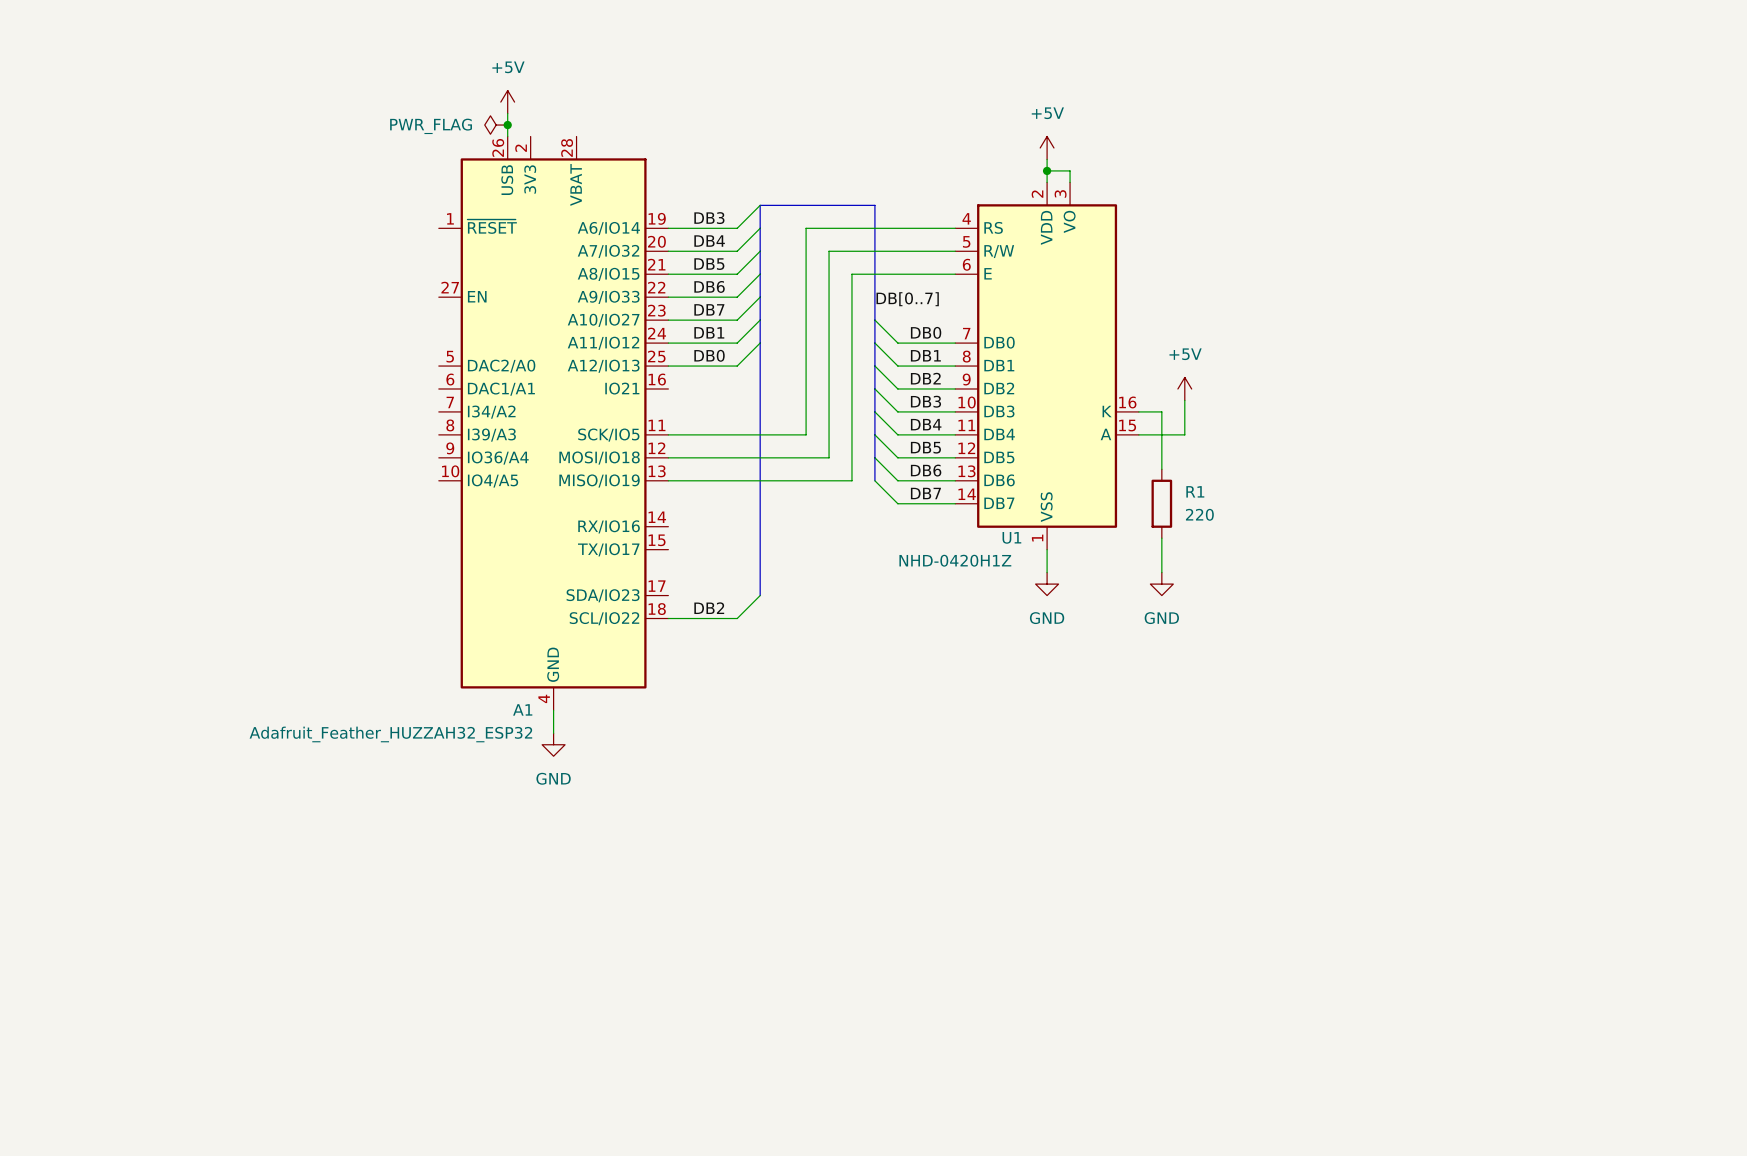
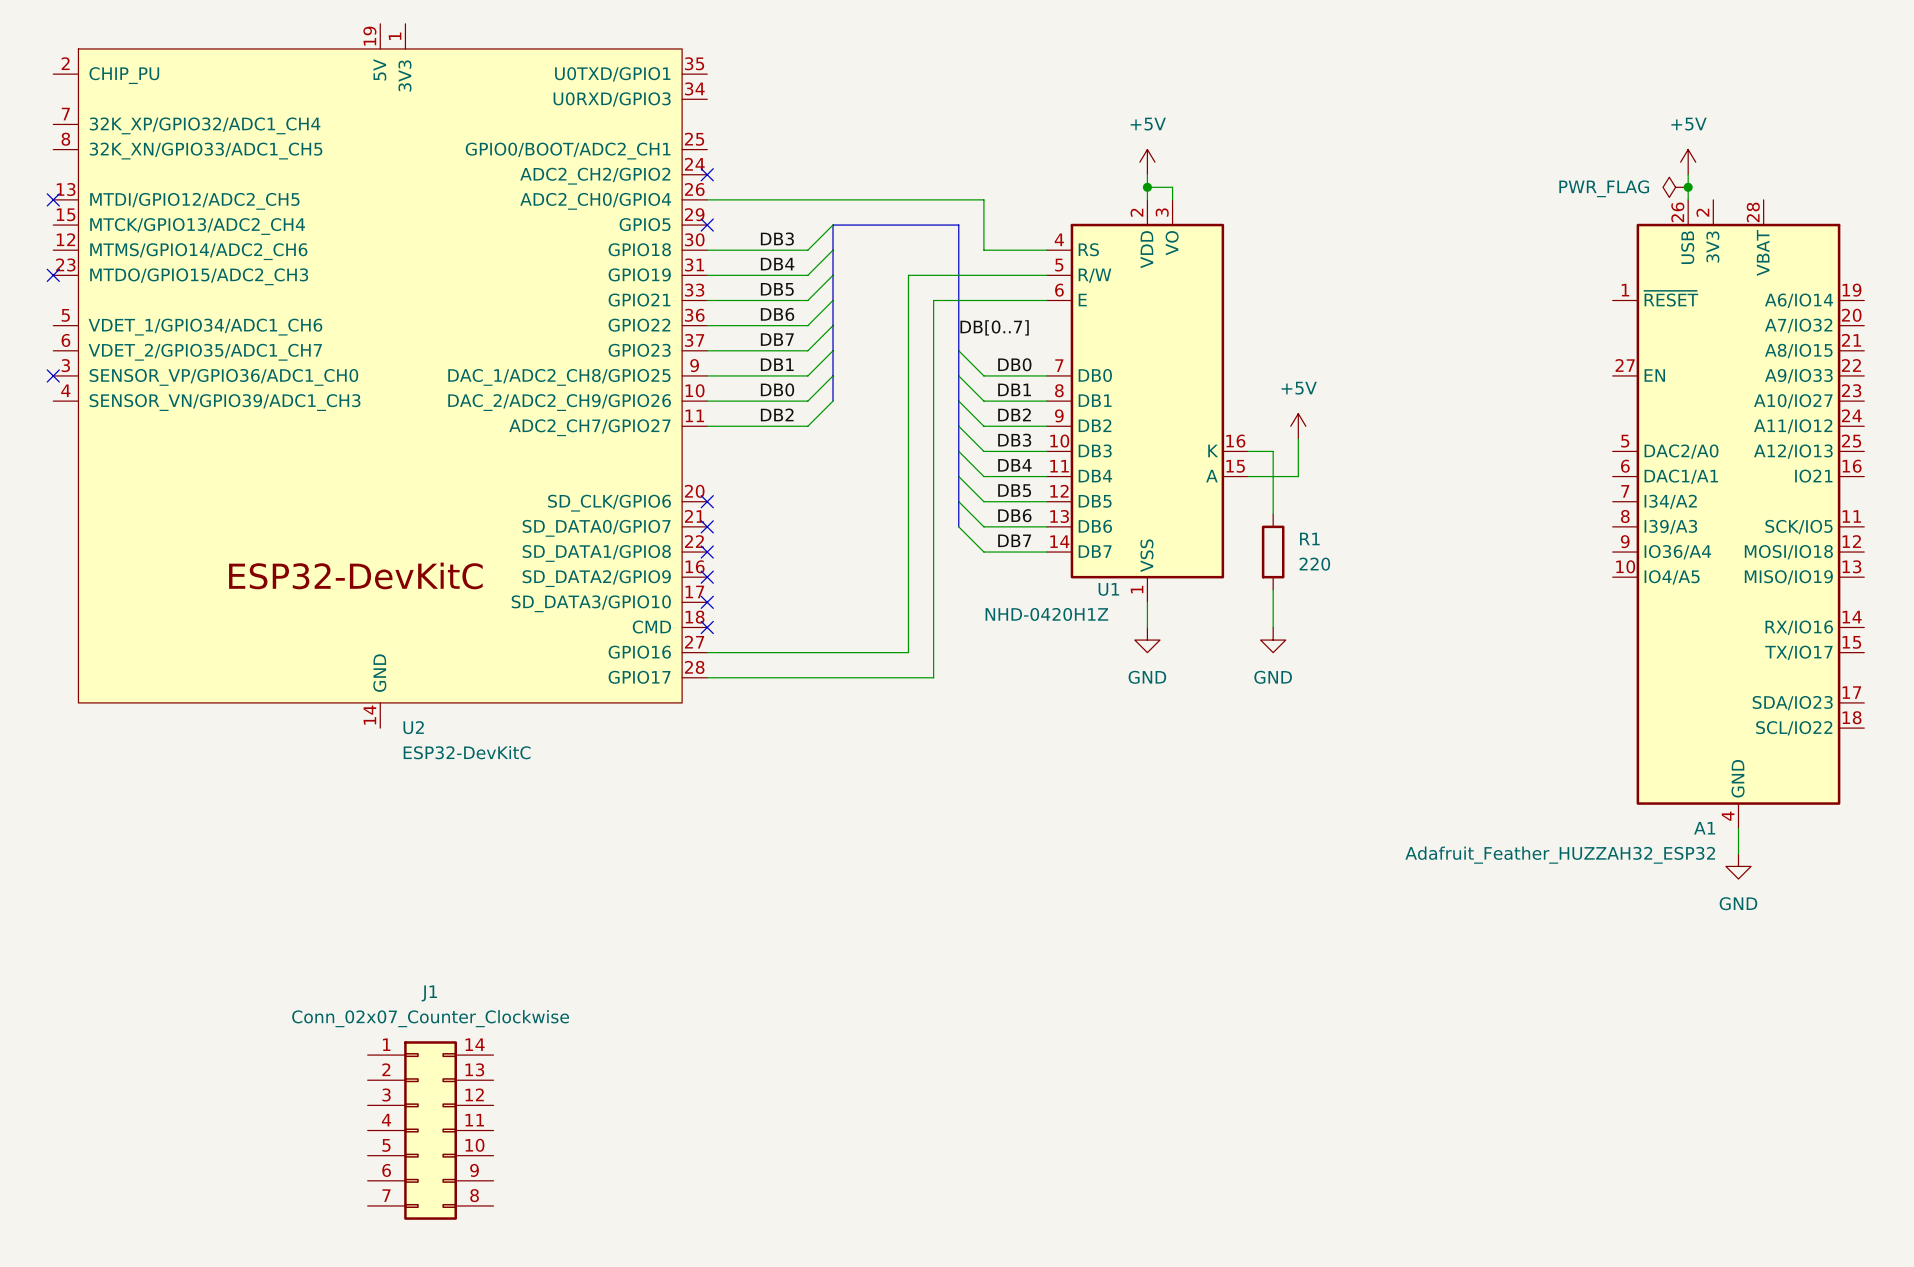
power symbol: +5V (507, 102) -> none
power symbol: PWR_FLAG (496, 125) -> none
junction: (507, 125) -> none
power symbol: none -> +5V (1688, 162)
no-connect mark: none -> (707, 174)
wire: none -> (1688, 174) (1688, 199)
power symbol: none -> PWR_FLAG (1675, 187)
junction: none -> (1688, 187)
no-connect mark: none -> (53, 199)
no-connect mark: none -> (707, 225)
wire: (897, 228) (806, 228) (806, 434) (668, 434) -> (983, 250) (983, 199) (707, 199)
no-connect mark: none -> (53, 275)
no-connect mark: none -> (53, 375)
U2: none -> ESP32-DevKitC (380, 375)
wire: none -> (833, 401) (807, 426) (707, 426)
bus: (760, 366) (760, 595) -> none
label: none -> DB2 (777, 414)
A1 position: (553, 423) -> (1738, 514)
no-connect mark: none -> (707, 501)
wire: (668, 457) (829, 457) -> (707, 652) (908, 652) (908, 501)
no-connect mark: none -> (707, 526)
wire: (668, 480) (851, 480) -> none
no-connect mark: none -> (707, 552)
no-connect mark: none -> (707, 577)
no-connect mark: none -> (707, 602)
no-connect mark: none -> (707, 627)
wire: (760, 595) (737, 618) -> (933, 526) (933, 677) (807, 677)
label: DB2 (709, 608) -> none
wire: (553, 710) (553, 733) -> none
power symbol: GND (553, 744) -> none
wire: none -> (1738, 828) (1738, 853)
power symbol: none -> GND (1738, 866)
J1: none -> Conn_02x07_Counter_Clockwise (430, 1130)

